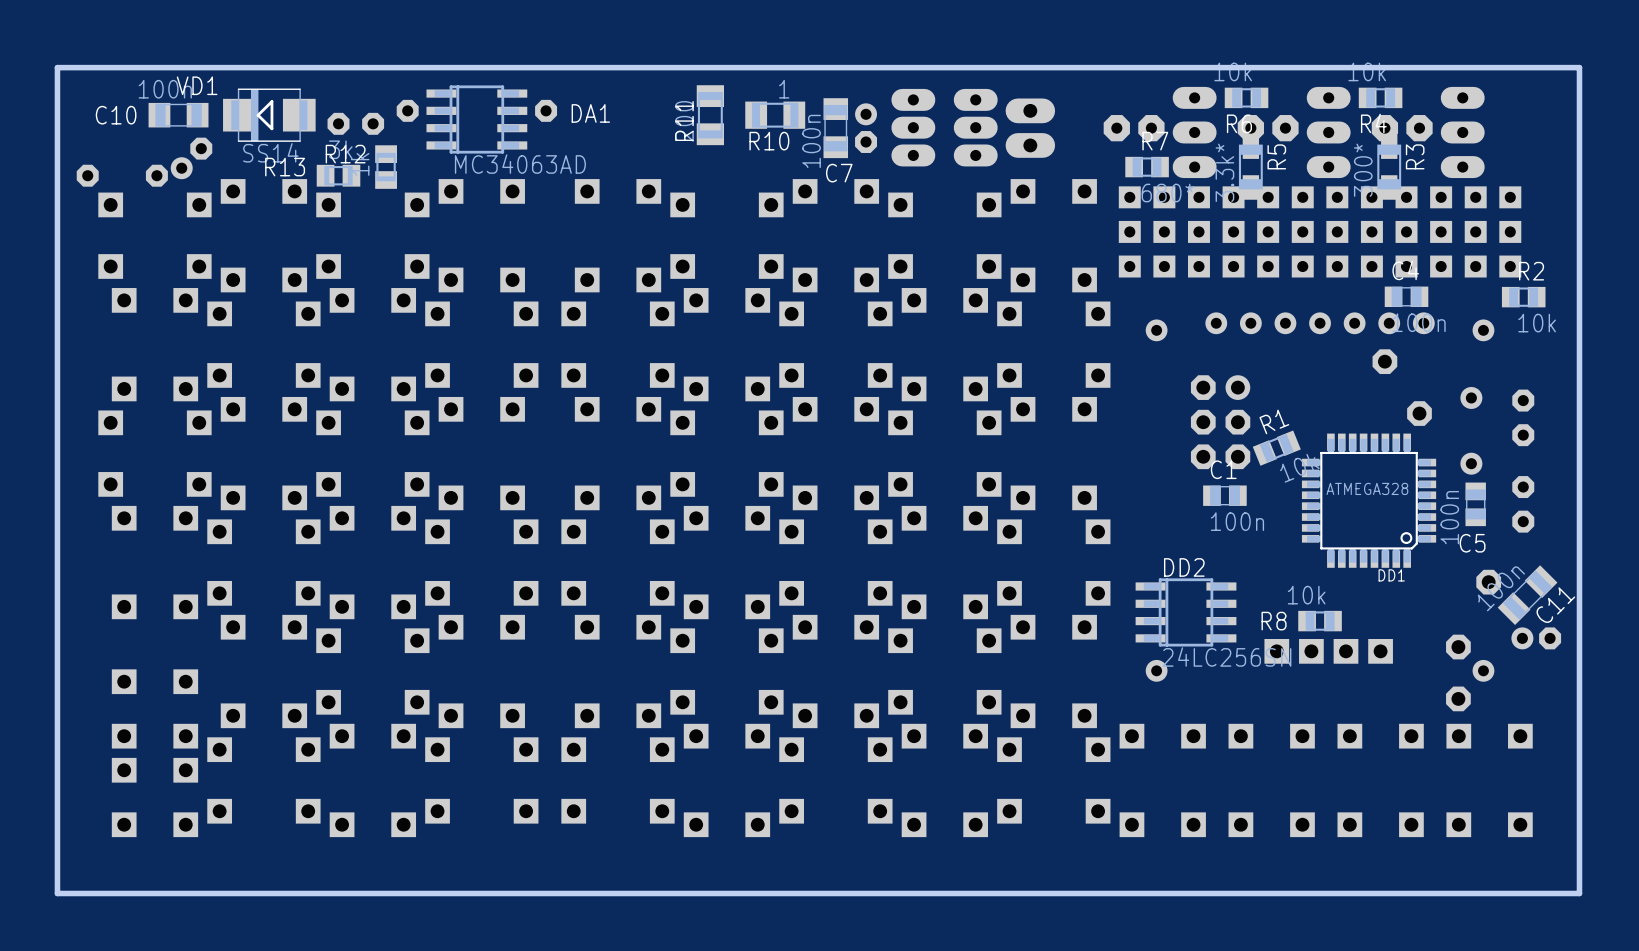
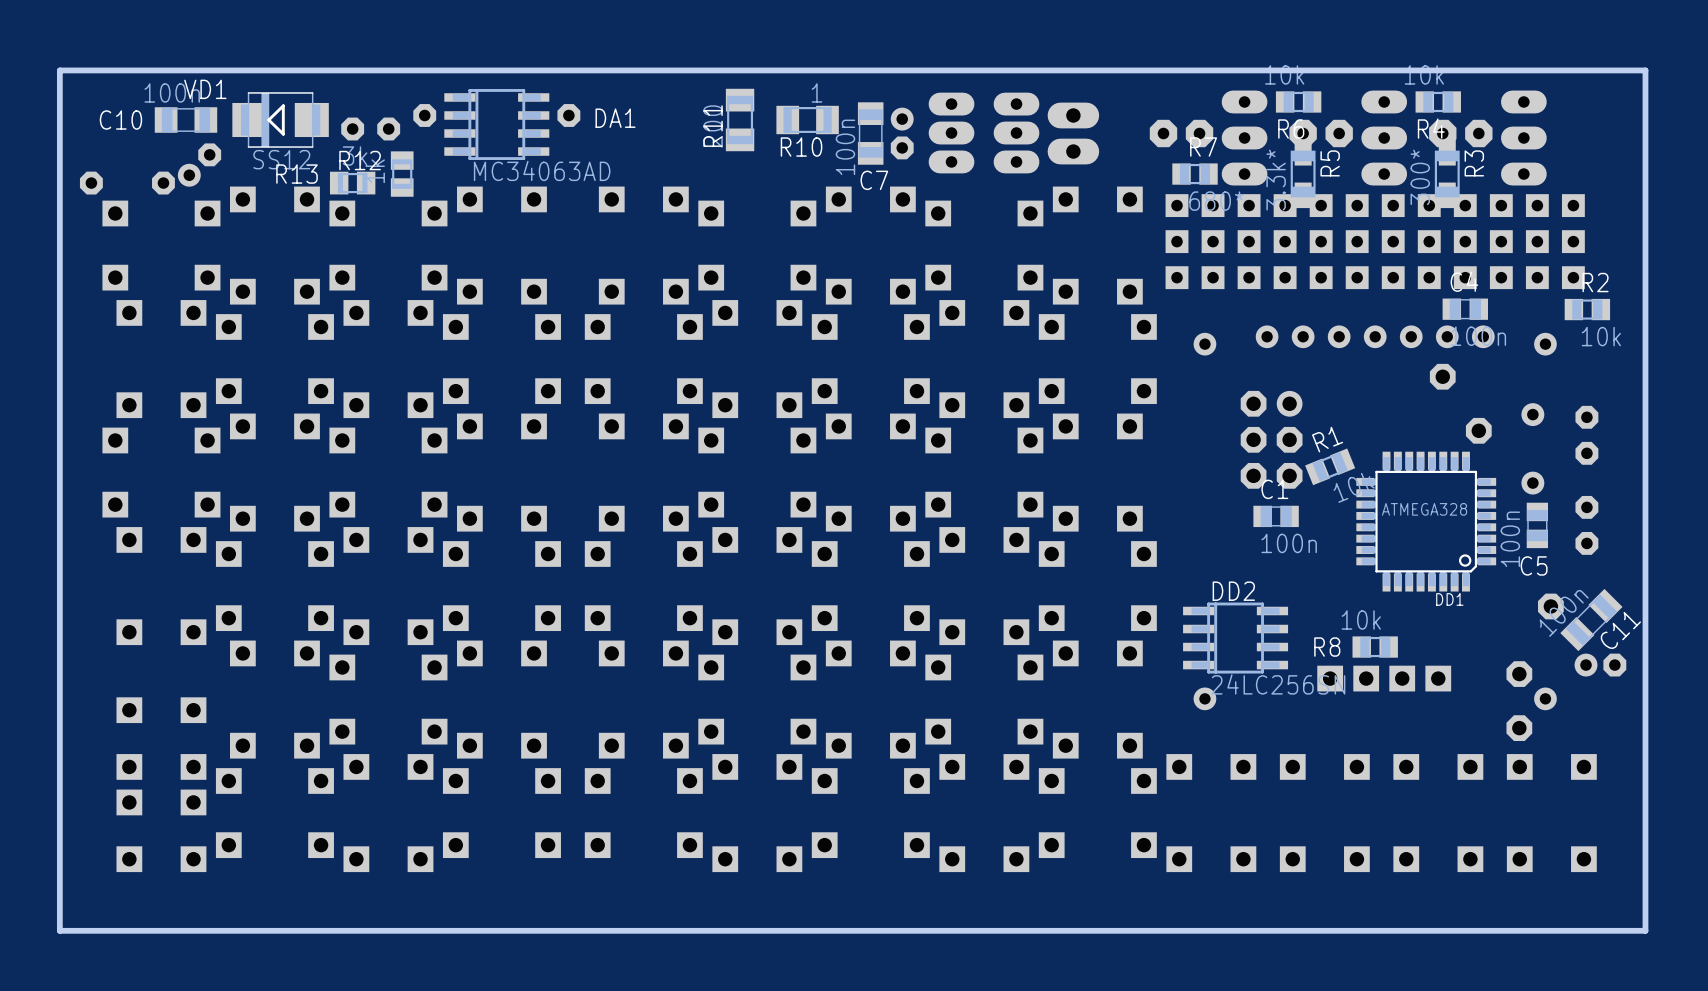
VD1 value: SS14 (270, 152) -> SS12 (281, 159)

